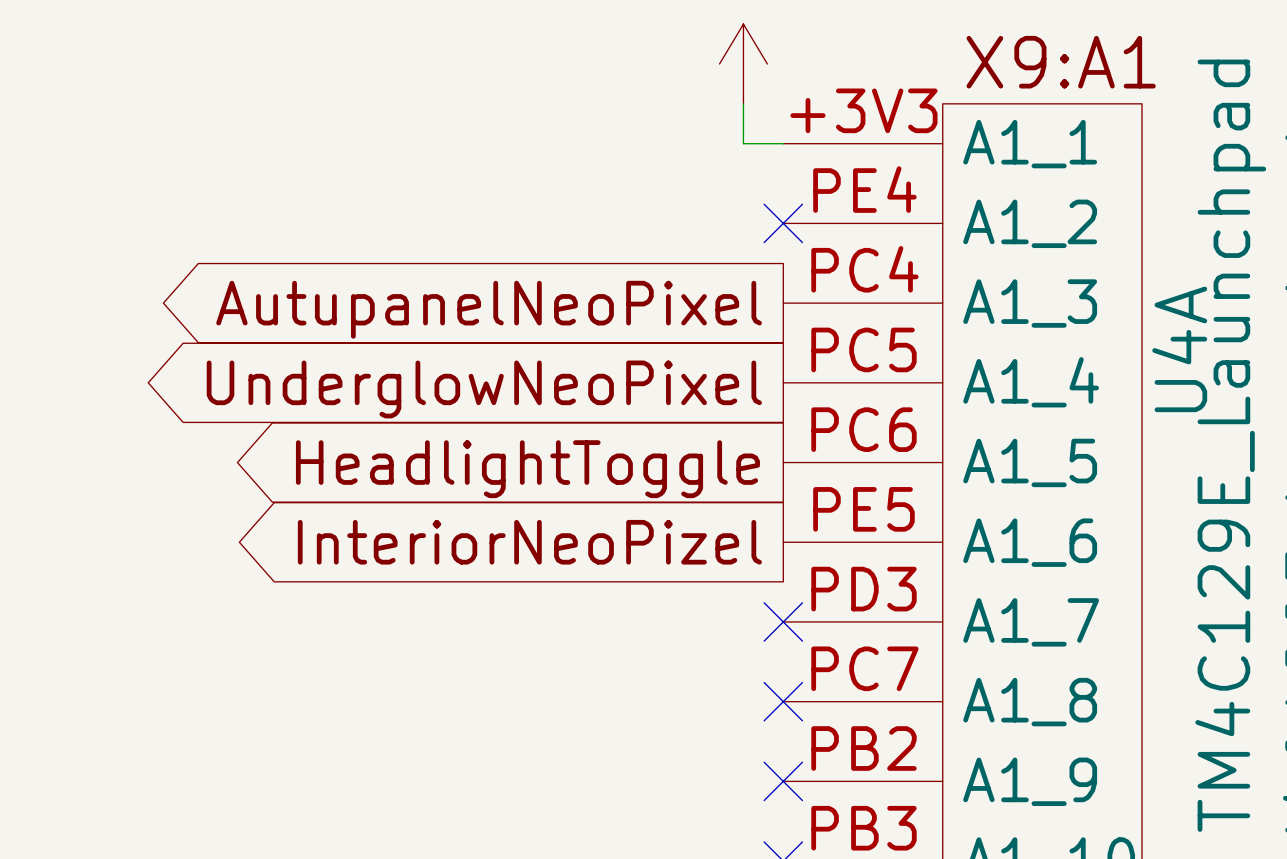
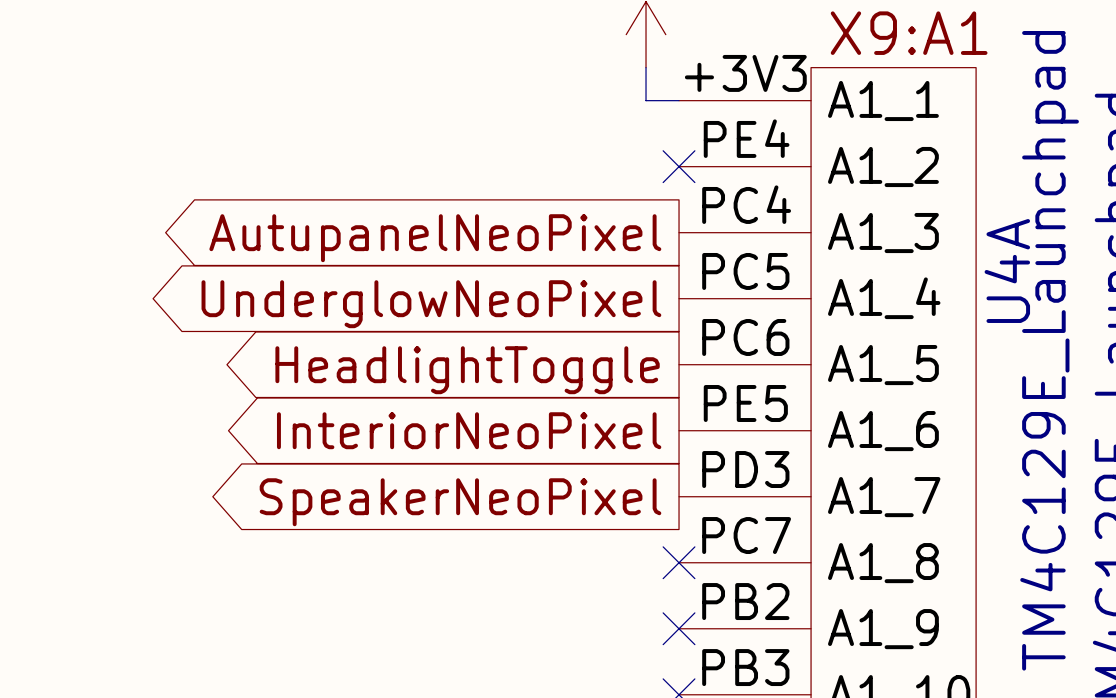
global label: InteriorNeoPizel (529, 542) -> InteriorNeoPixel (469, 430)
no-connect mark: (783, 621) -> none
global label: none -> SpeakerNeoPixel (460, 502)

